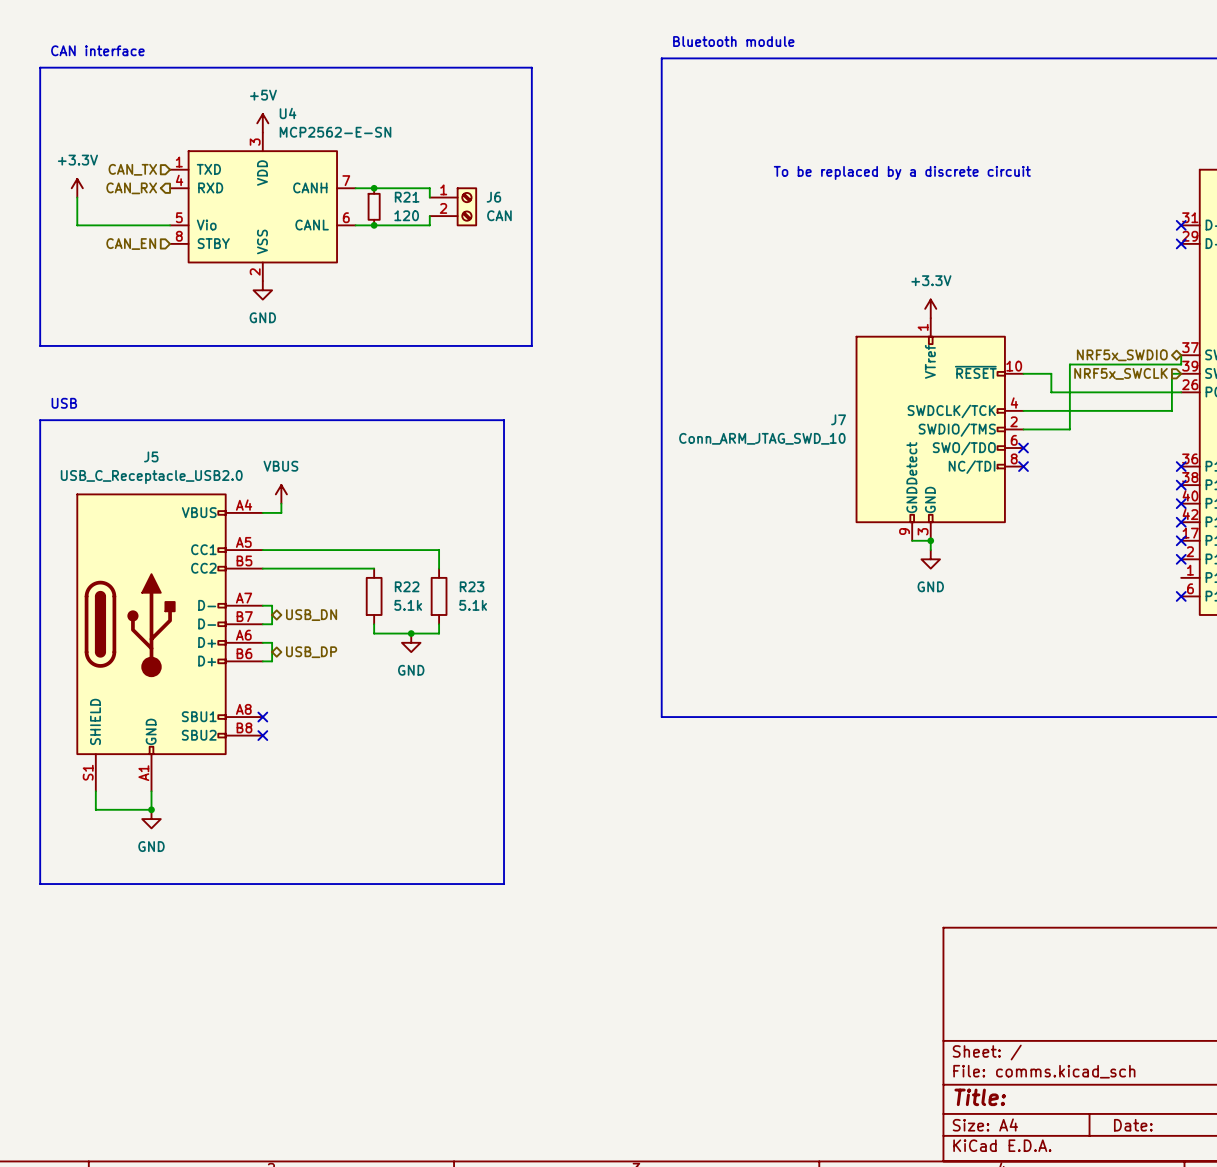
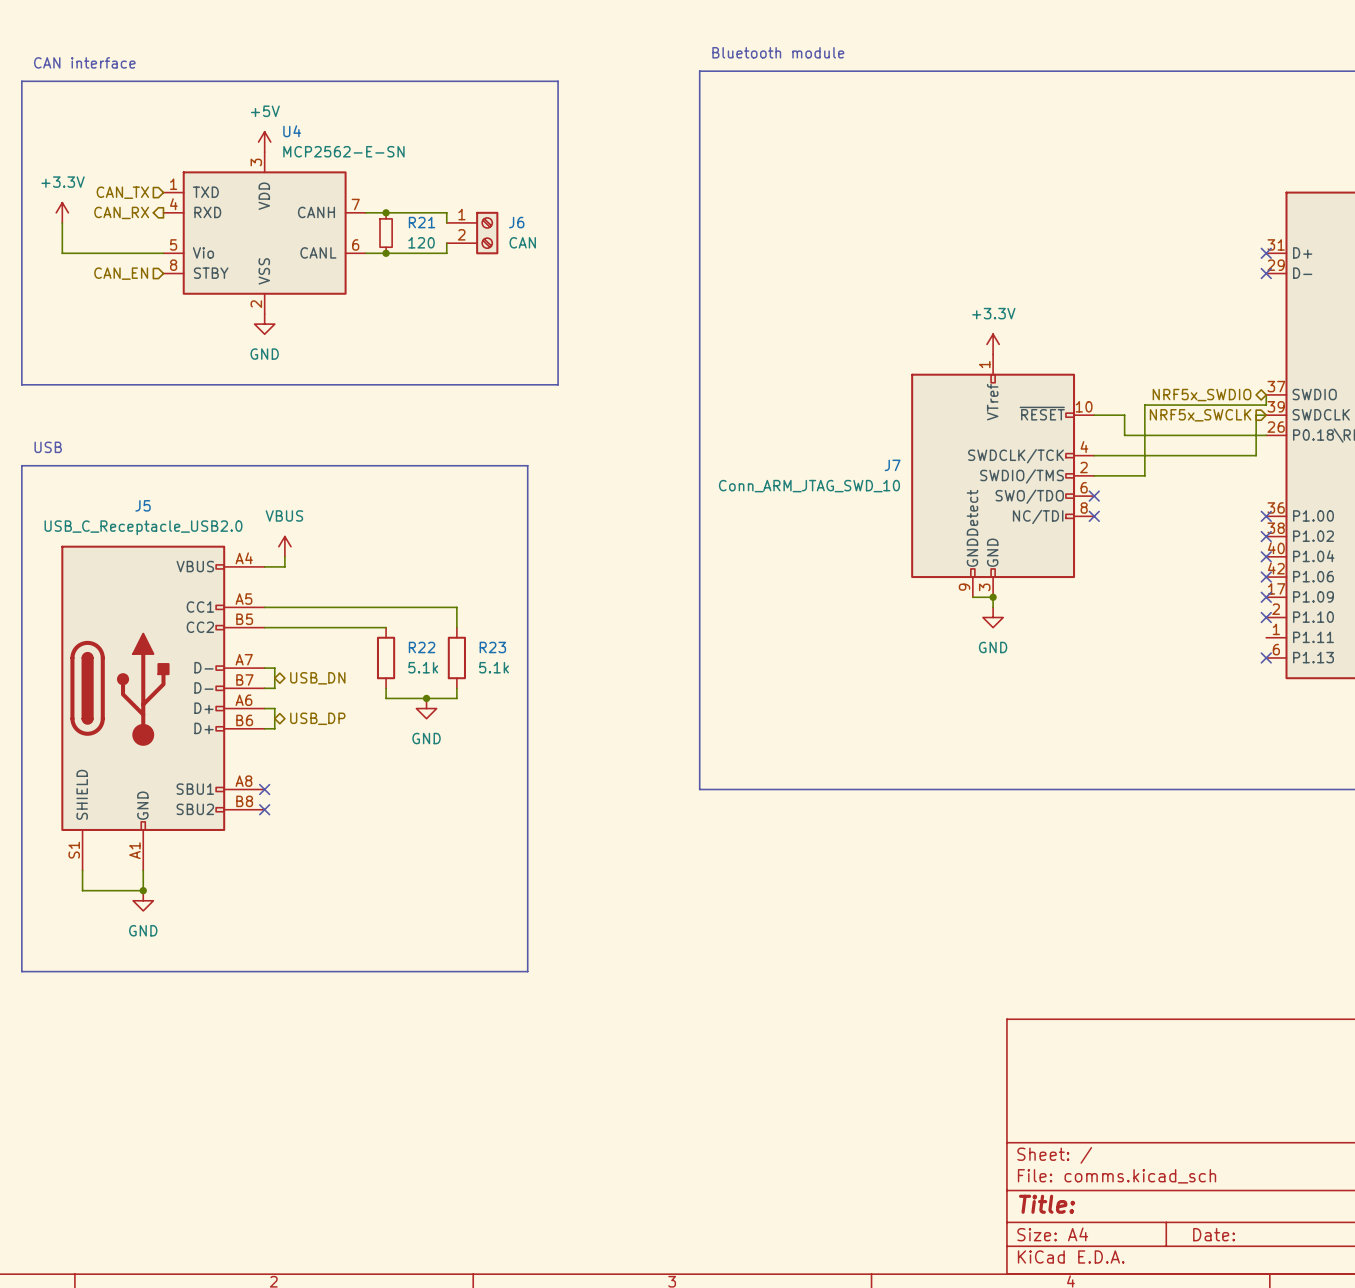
text: To be replaced by a discrete circuit (902, 172) -> none

